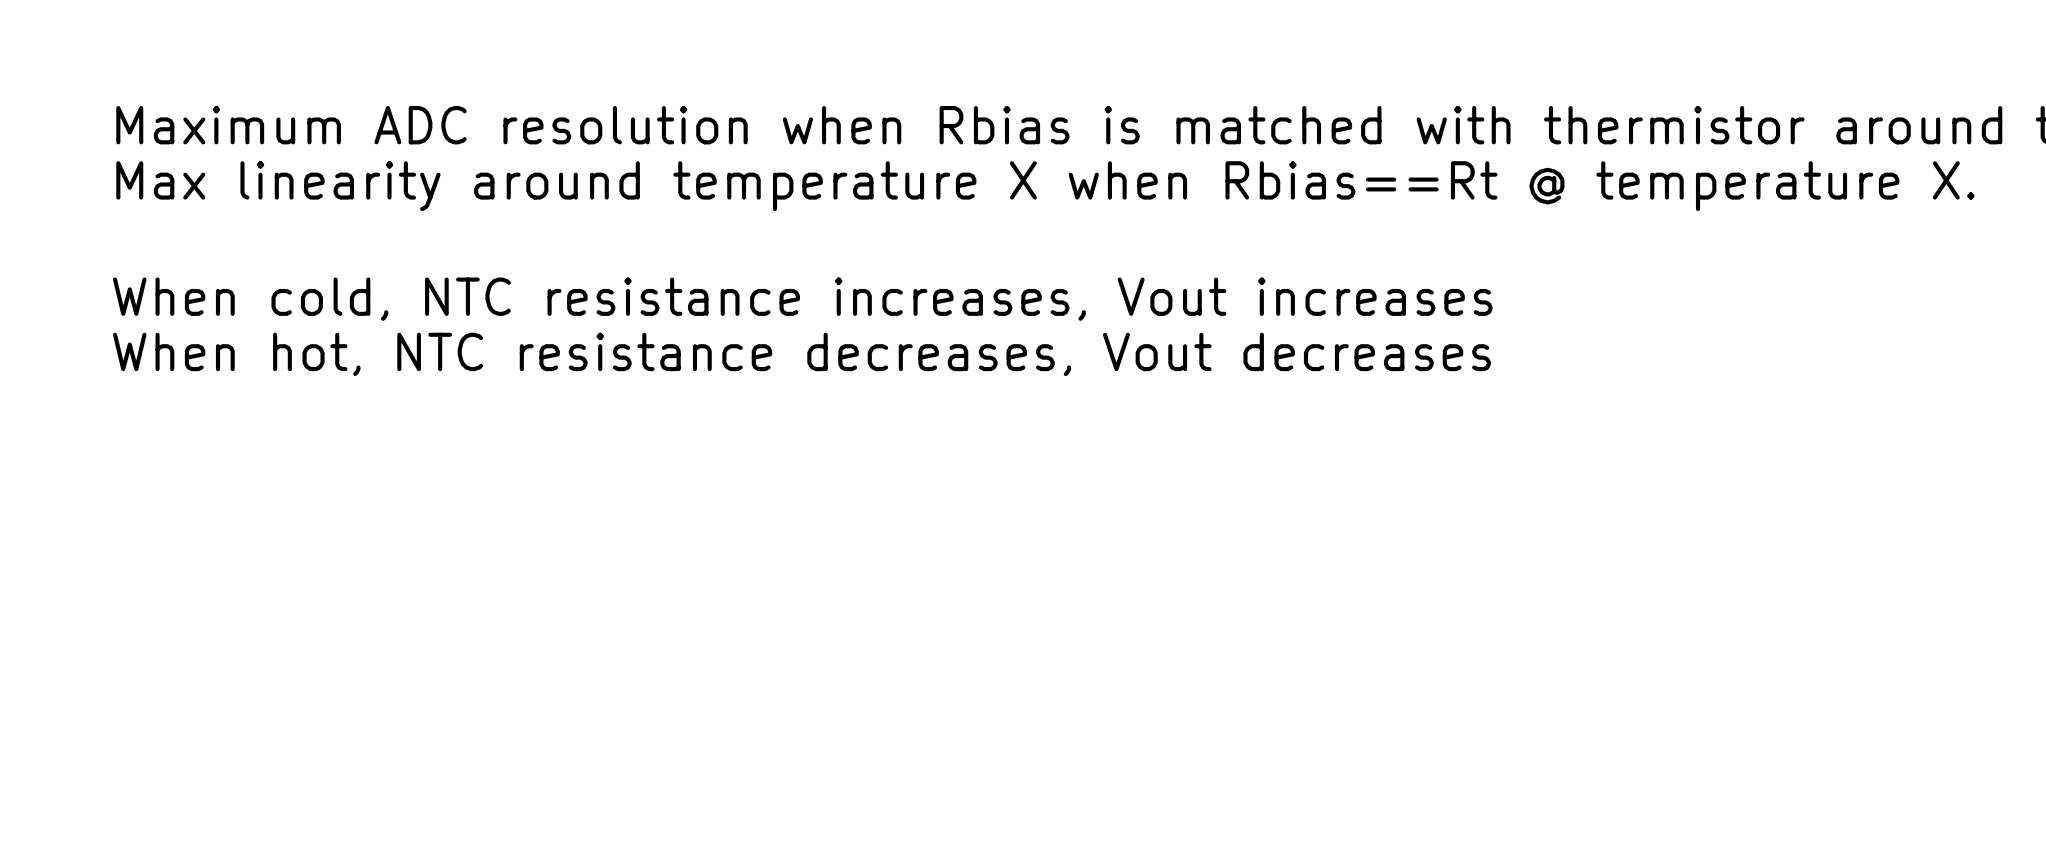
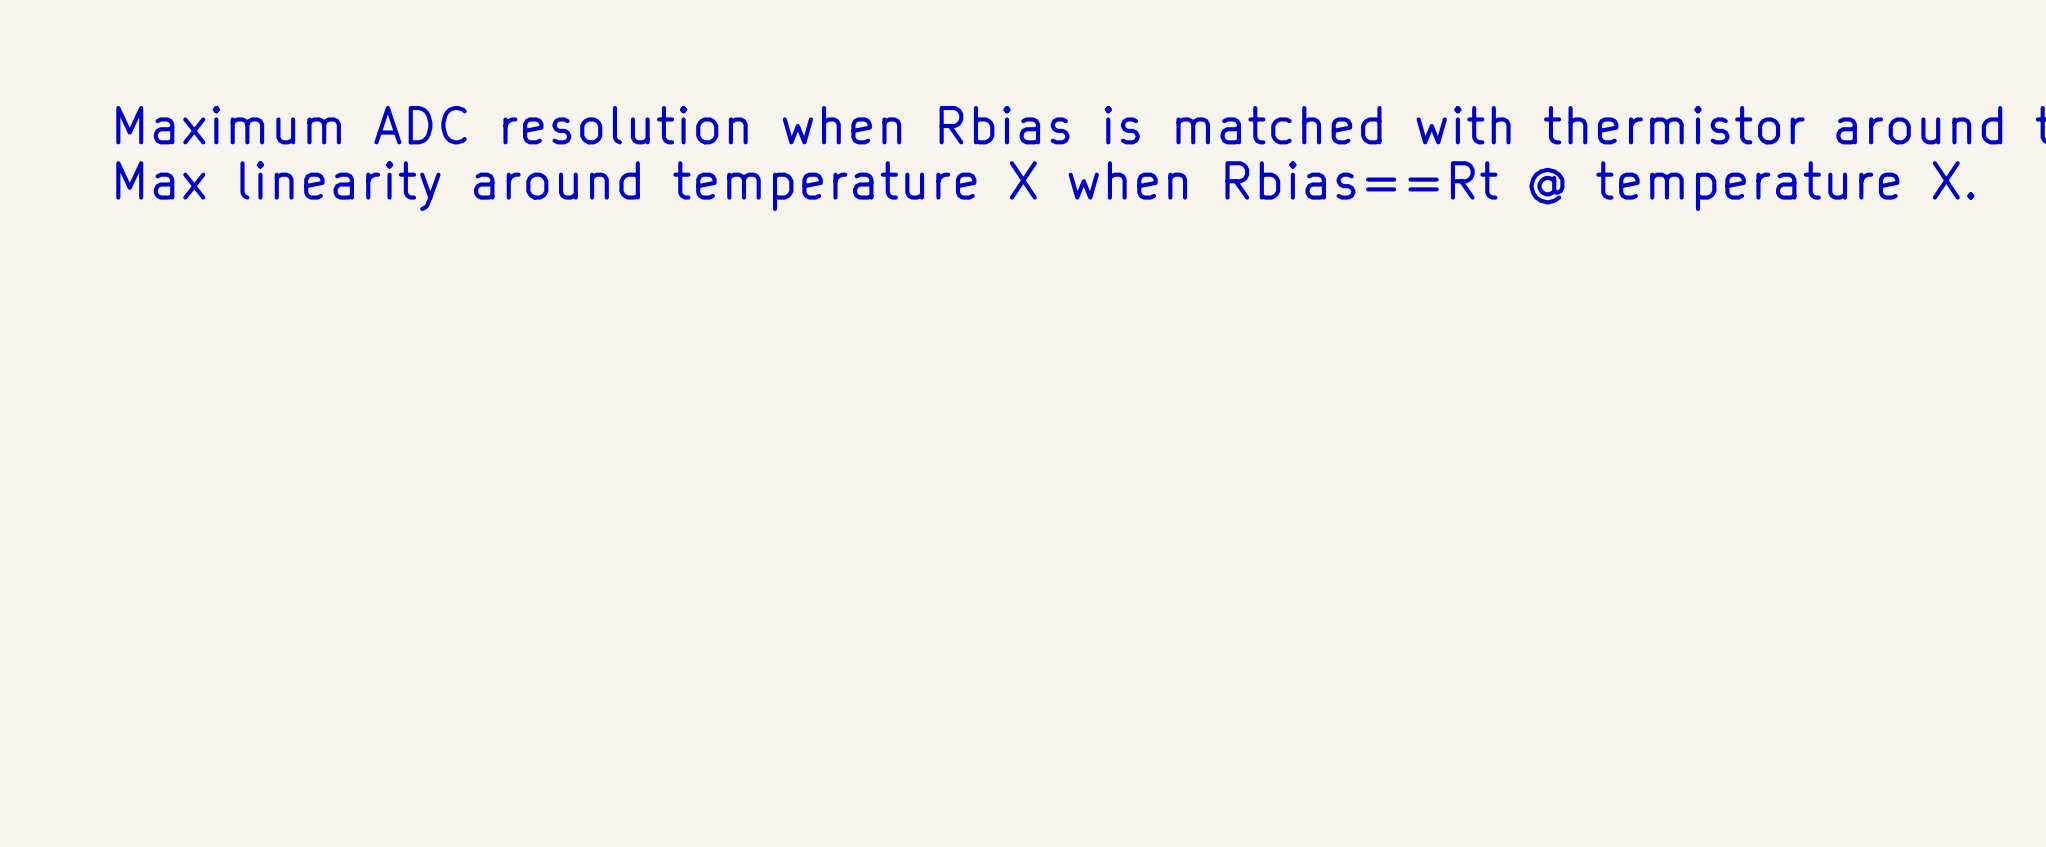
text: When cold, NTC resistance increases, Vout increases (802, 299) -> none
text: When hot, NTC resistance decreases, Vout decreases (801, 354) -> none

